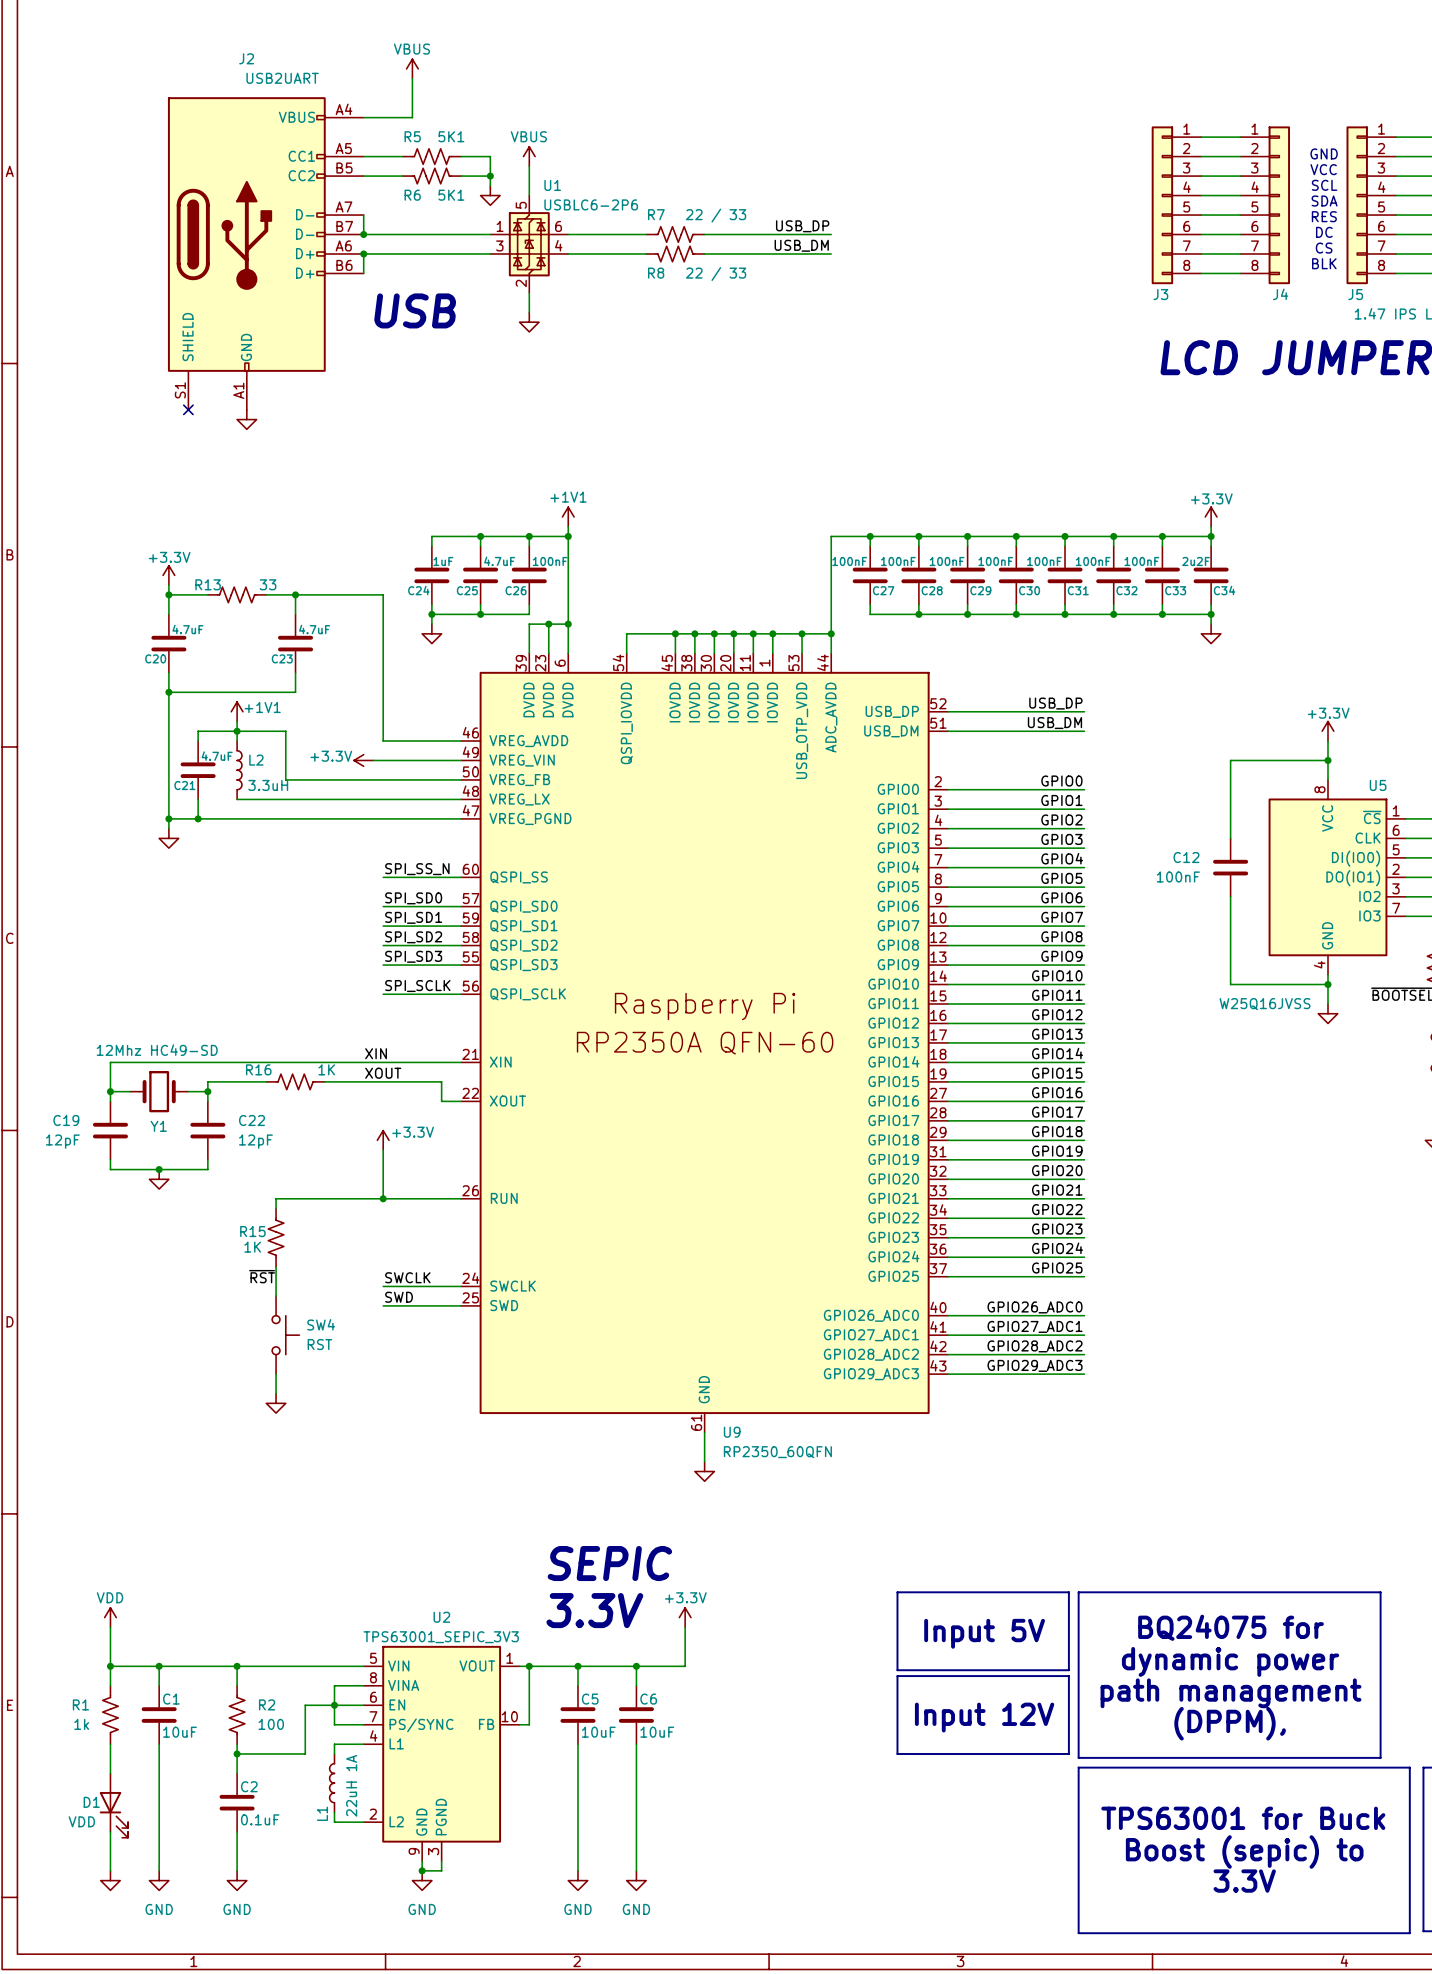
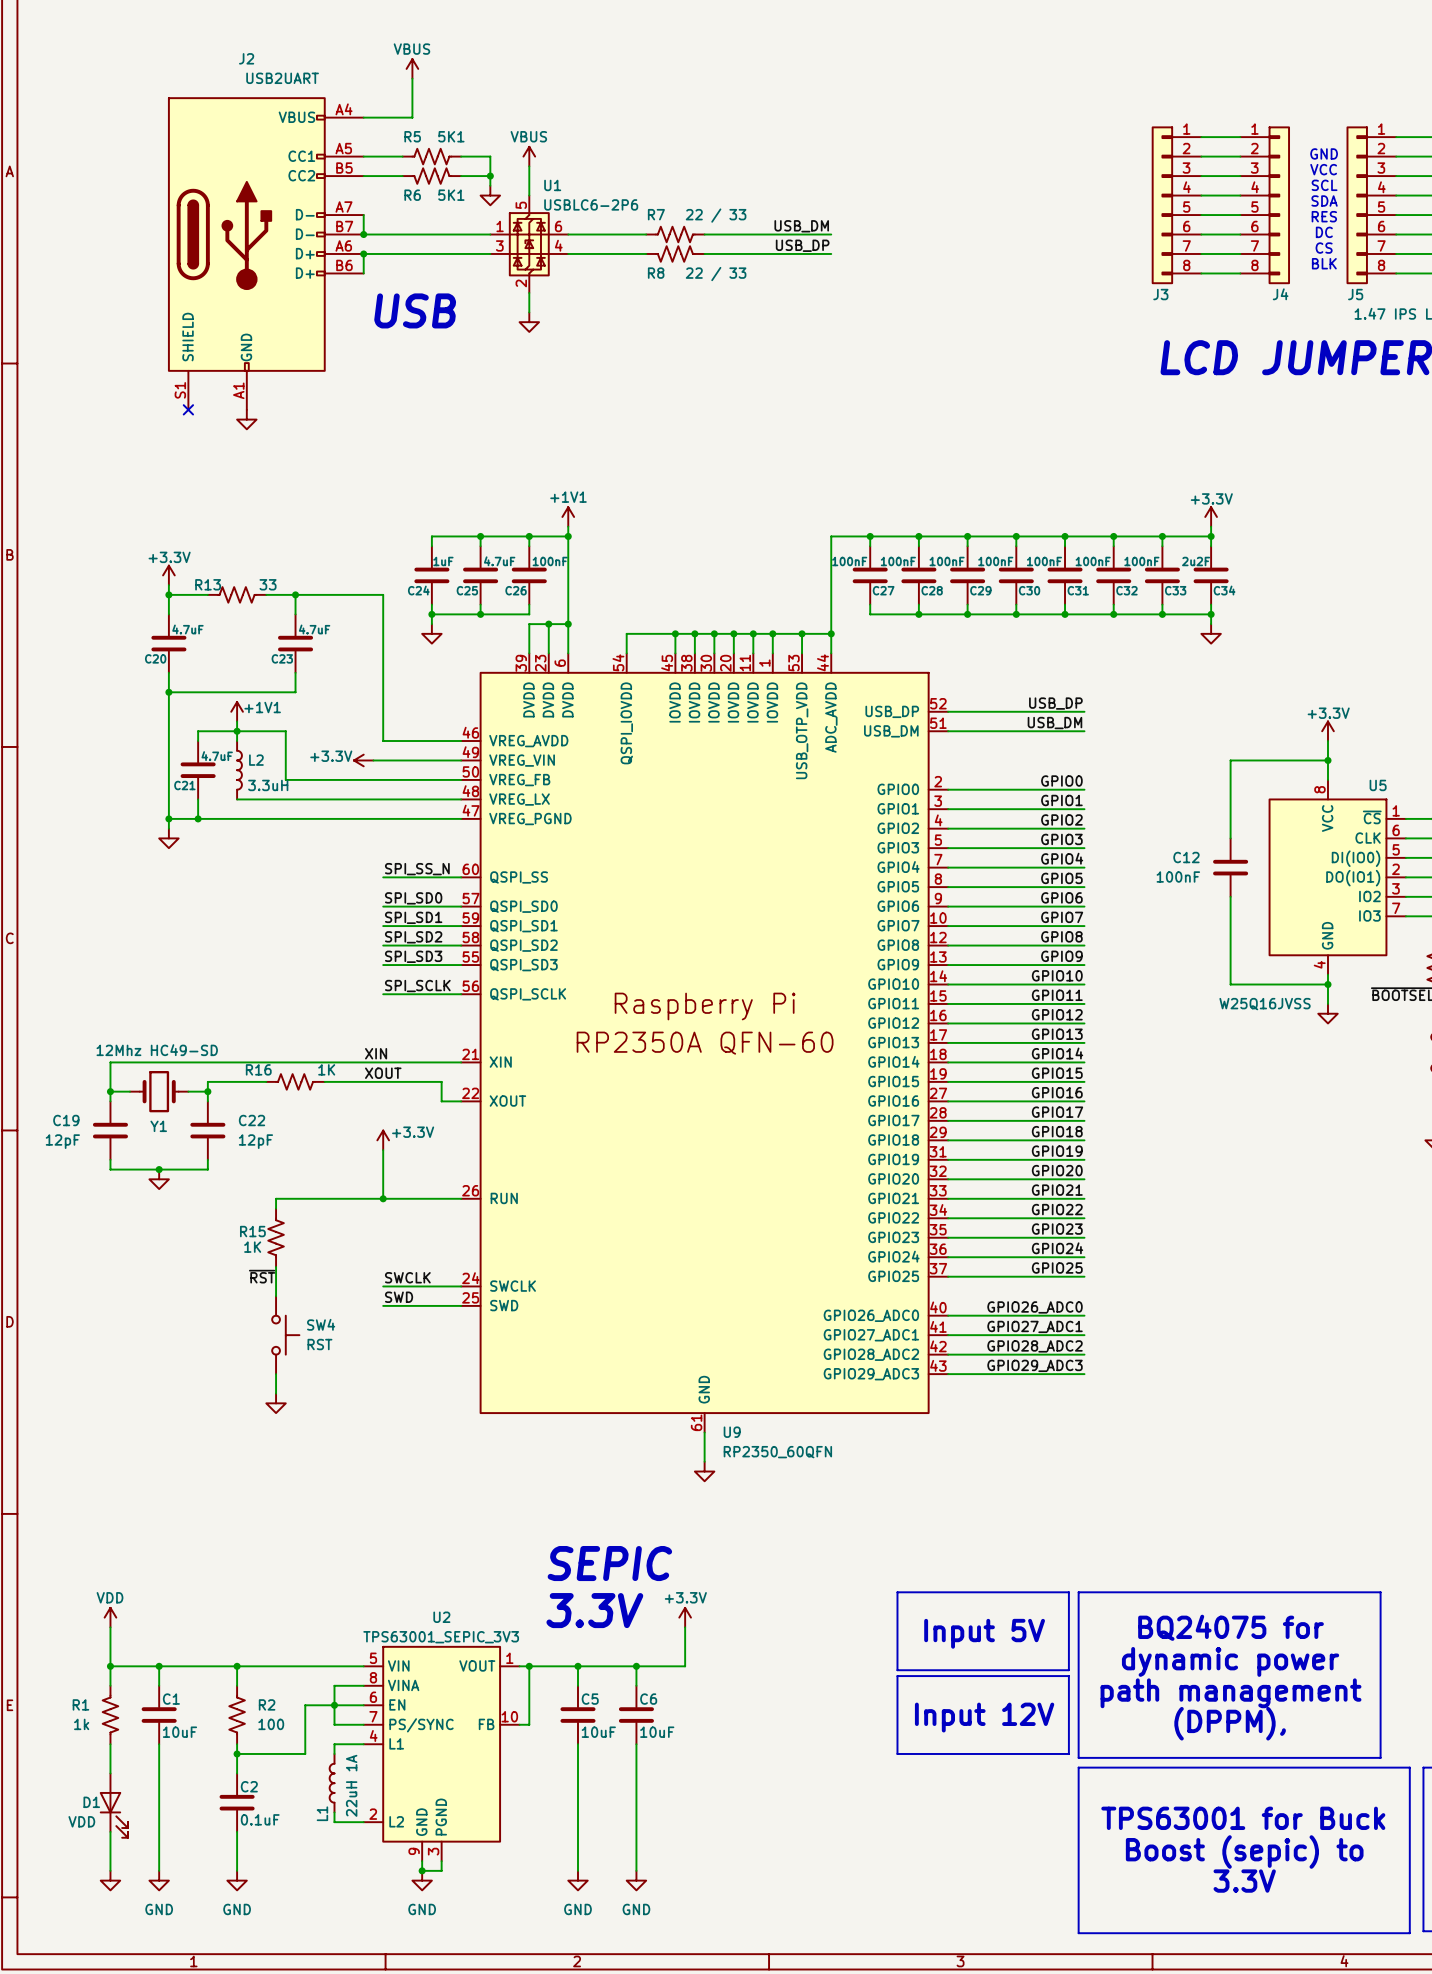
label: USB_DP (802, 226) -> USB_DM (801, 226)
label: USB_DM (801, 245) -> USB_DP (802, 245)

